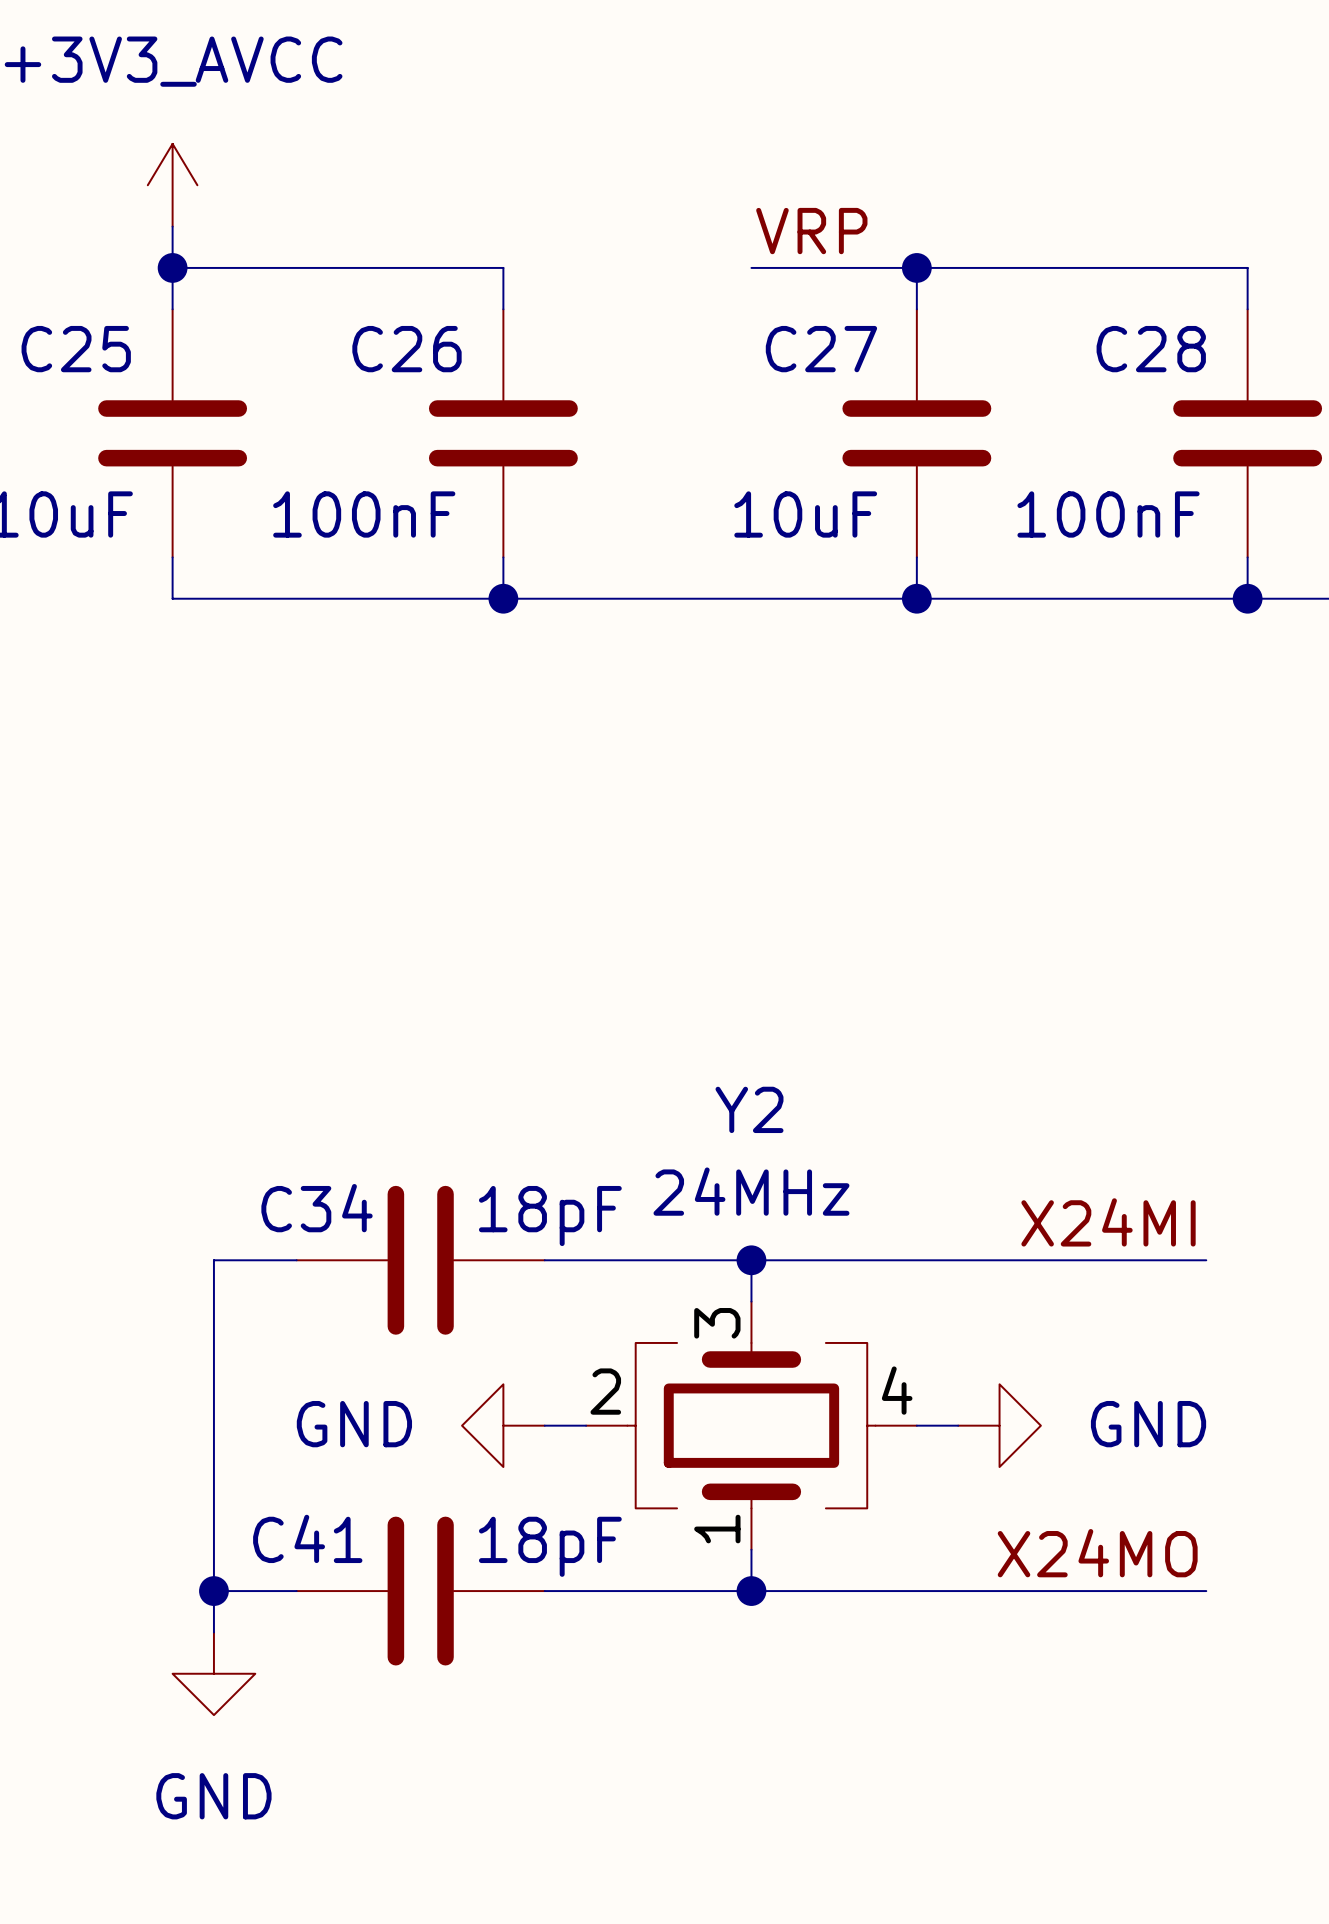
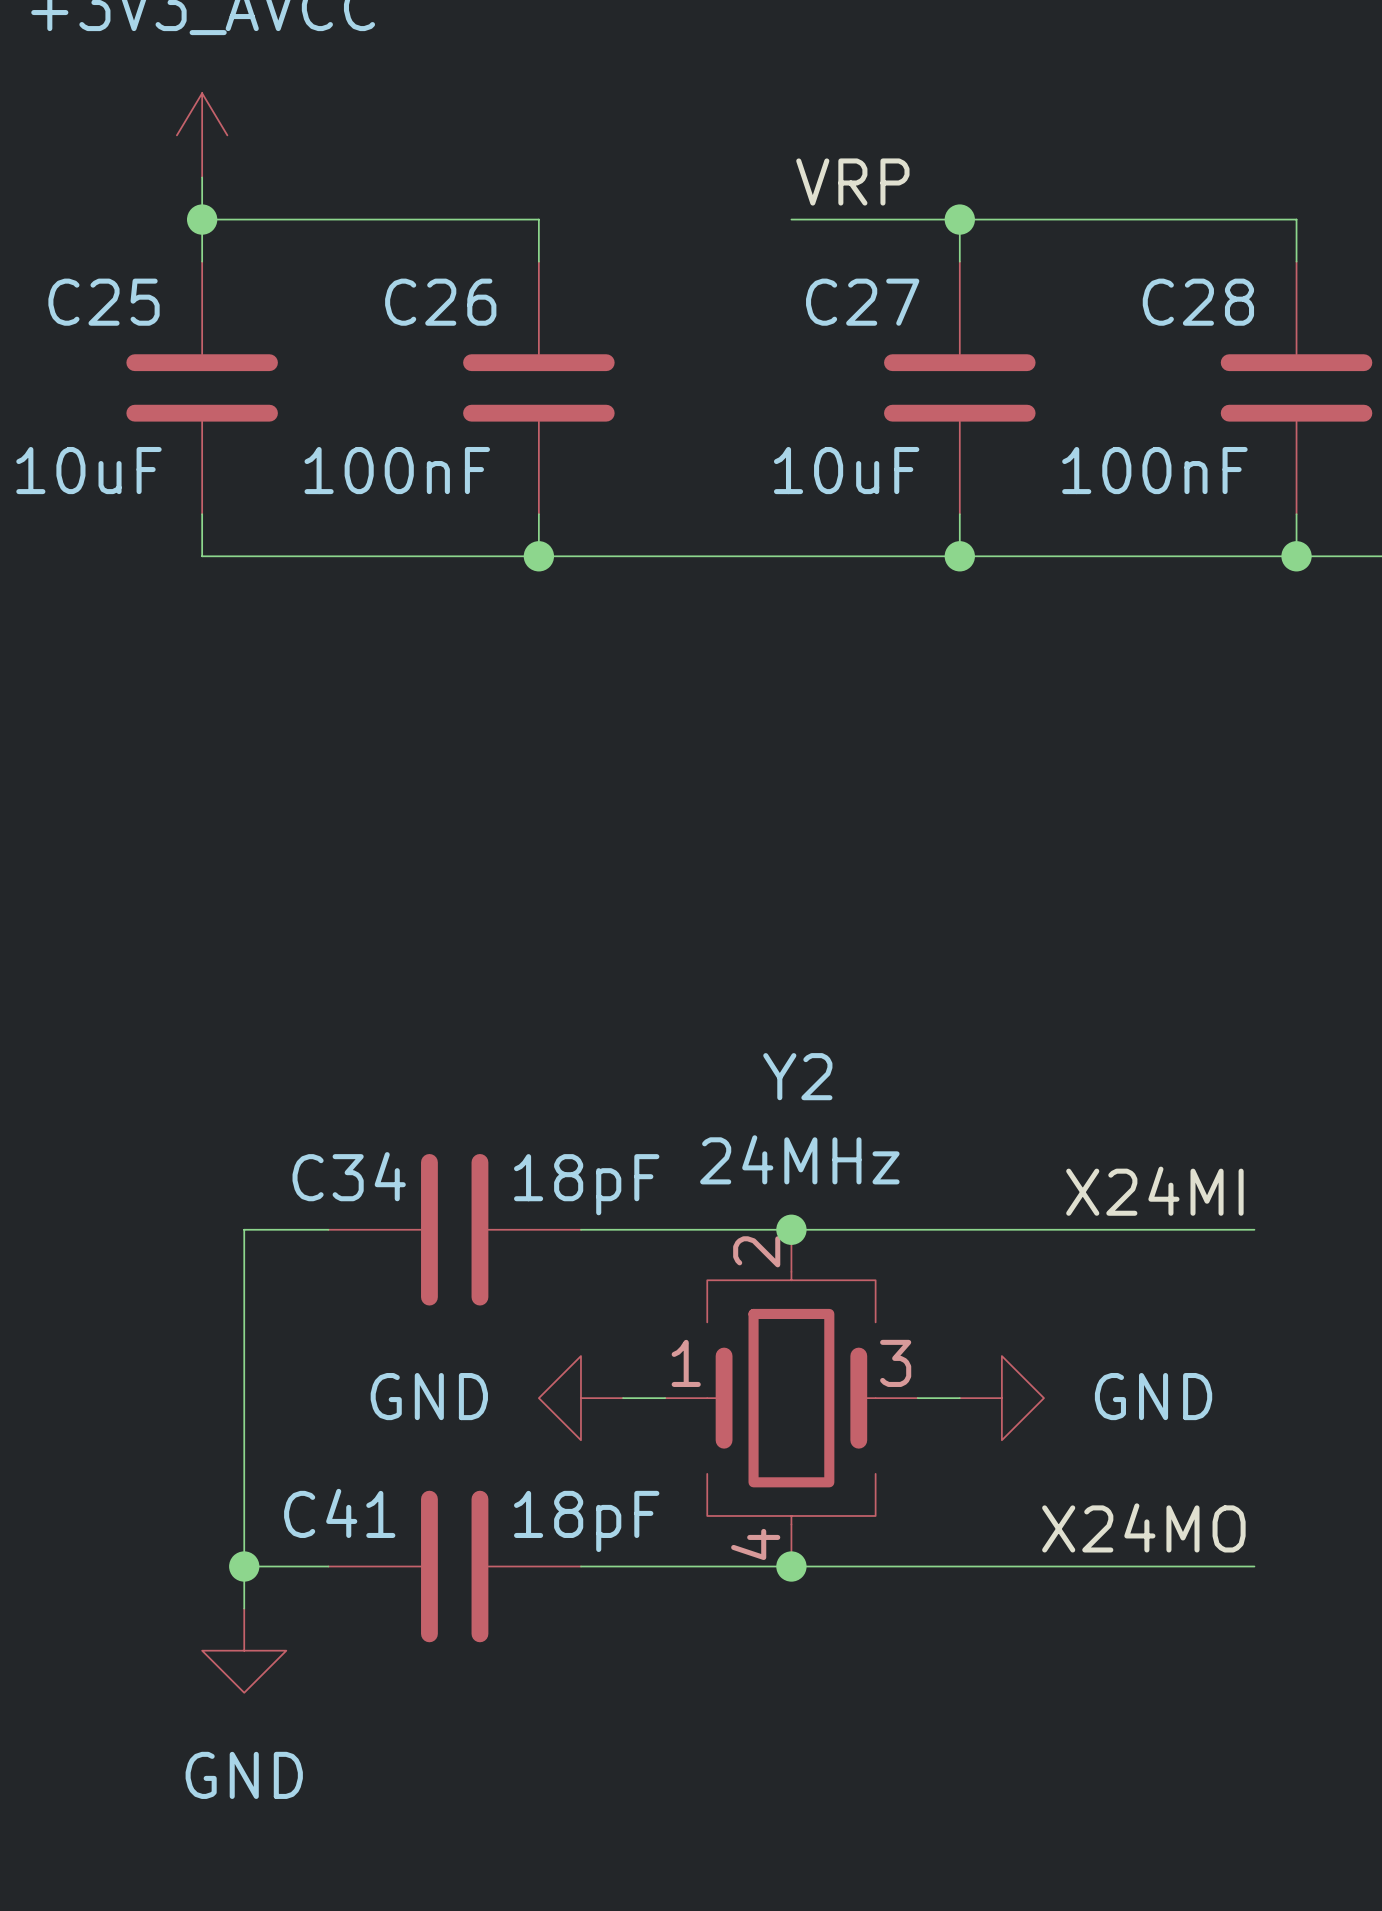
power symbol position: GND (503, 1425) -> GND (580, 1398)
Y2 rotation: 0° (751, 1425) -> 90° clockwise (791, 1398)
power symbol position: GND (999, 1425) -> GND (1001, 1398)

